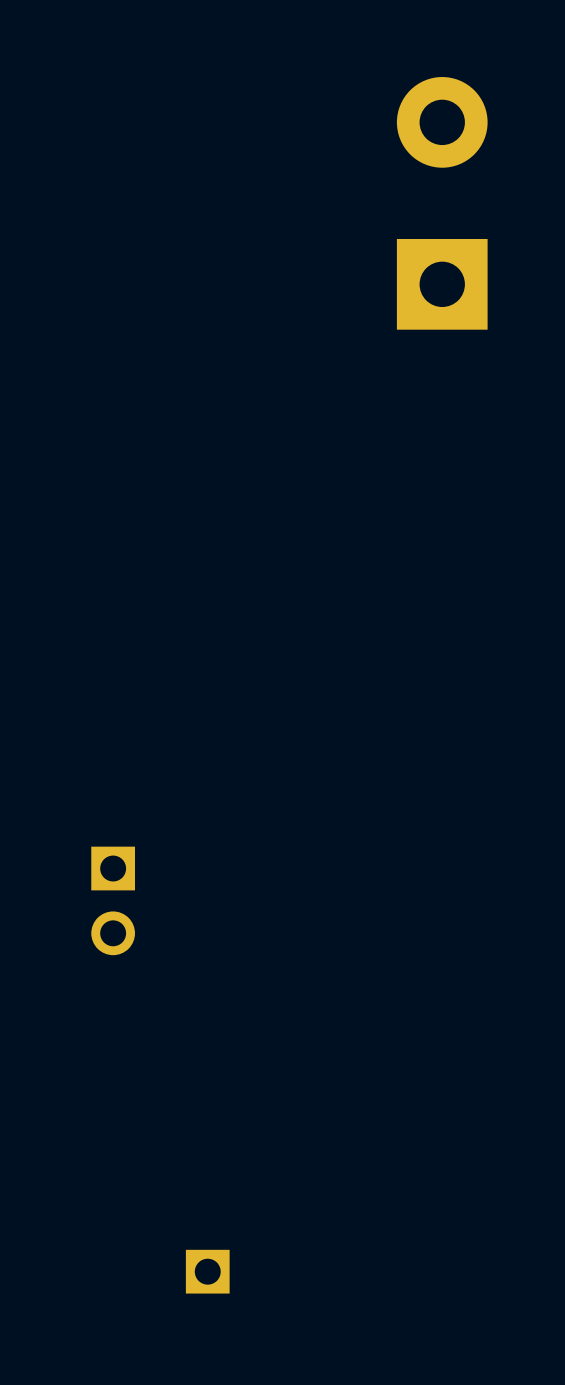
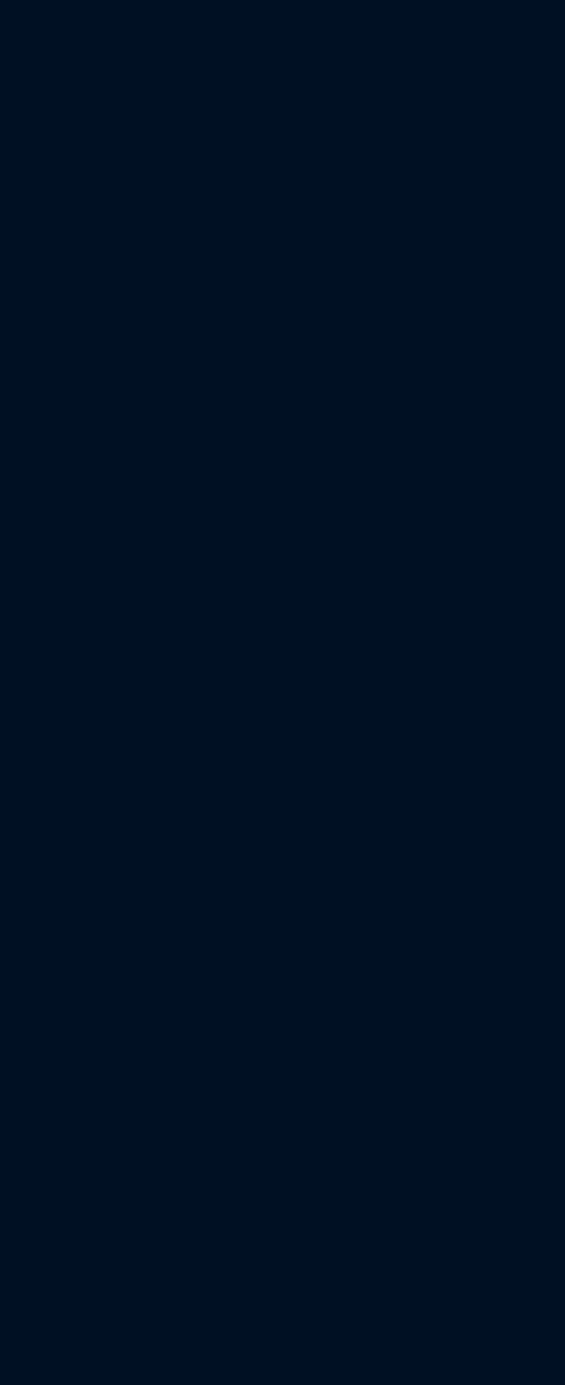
part: (442, 203) -> none
part: (113, 900) -> none
part: (207, 1271) -> none

